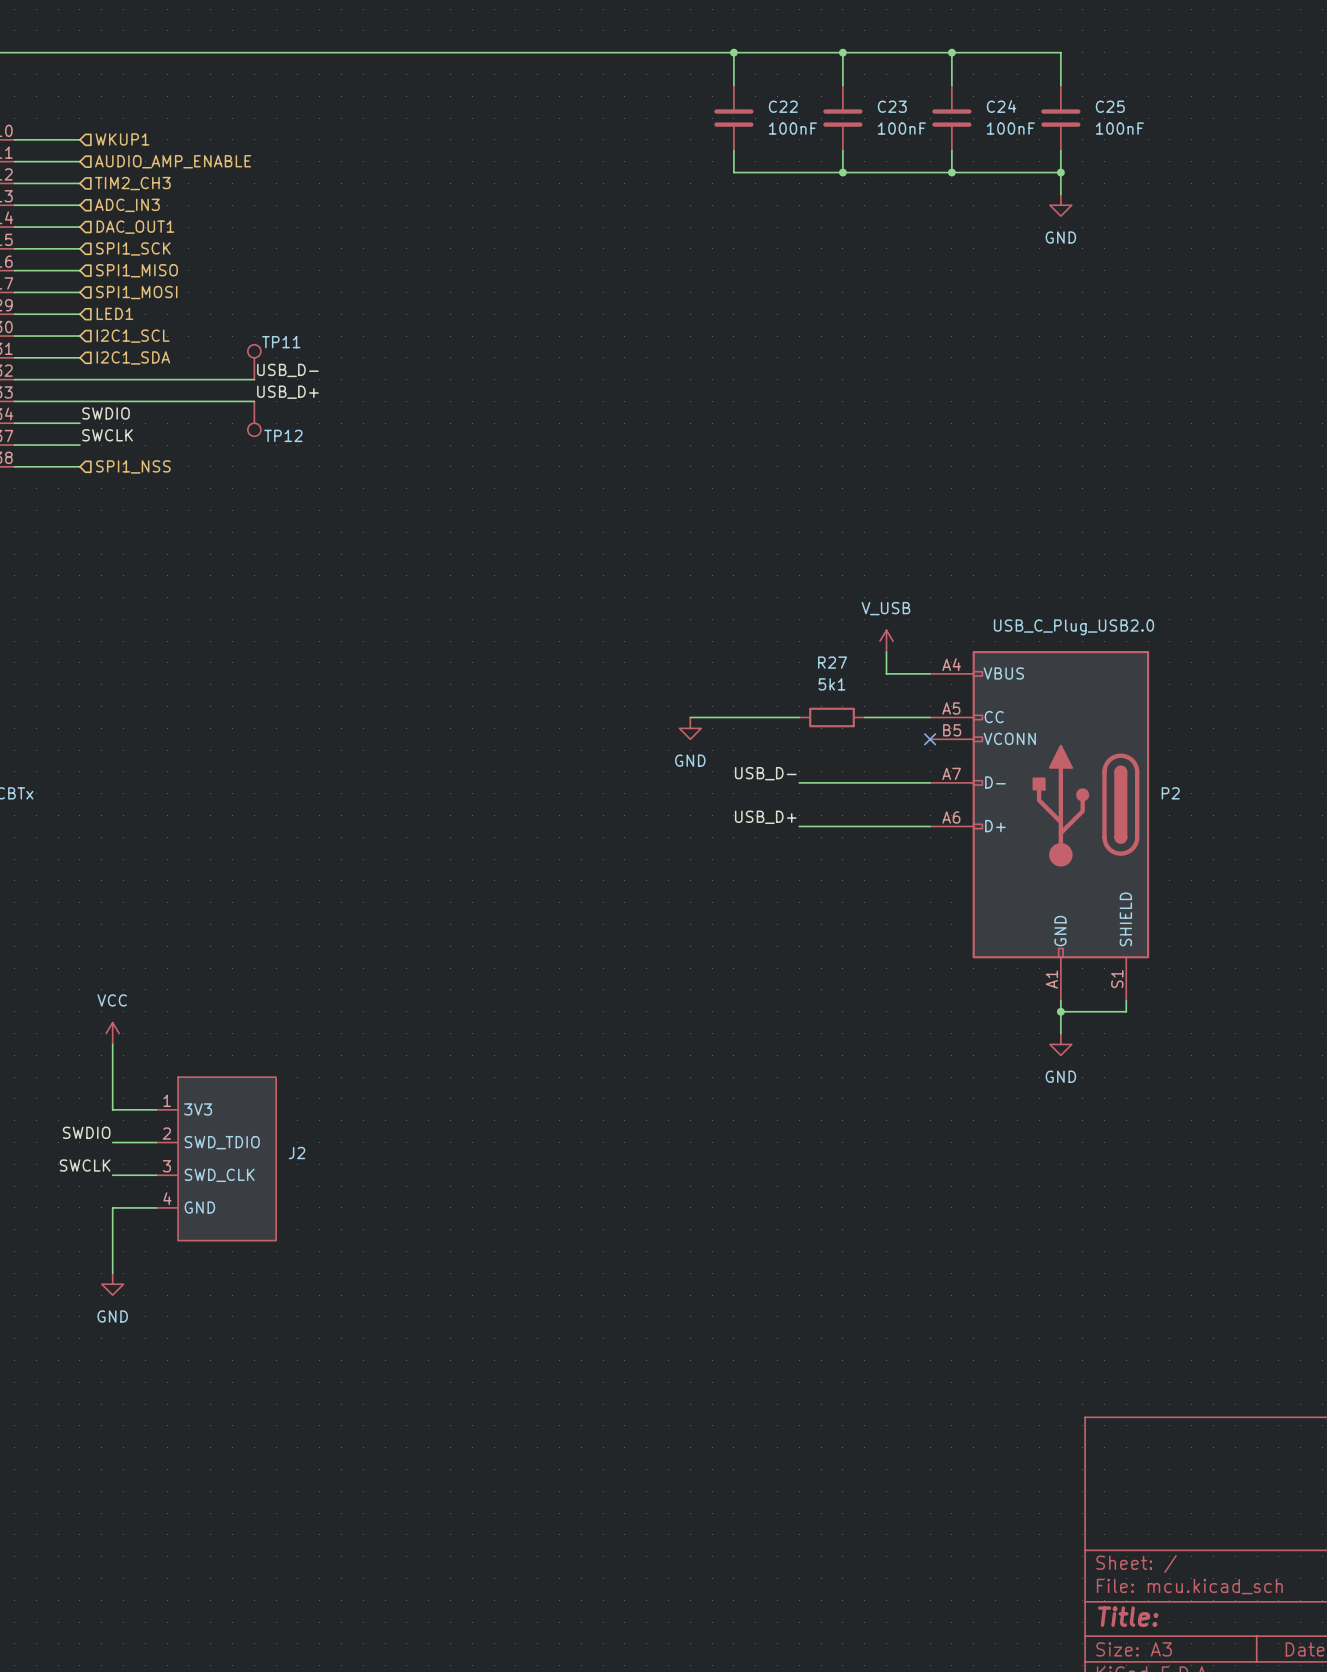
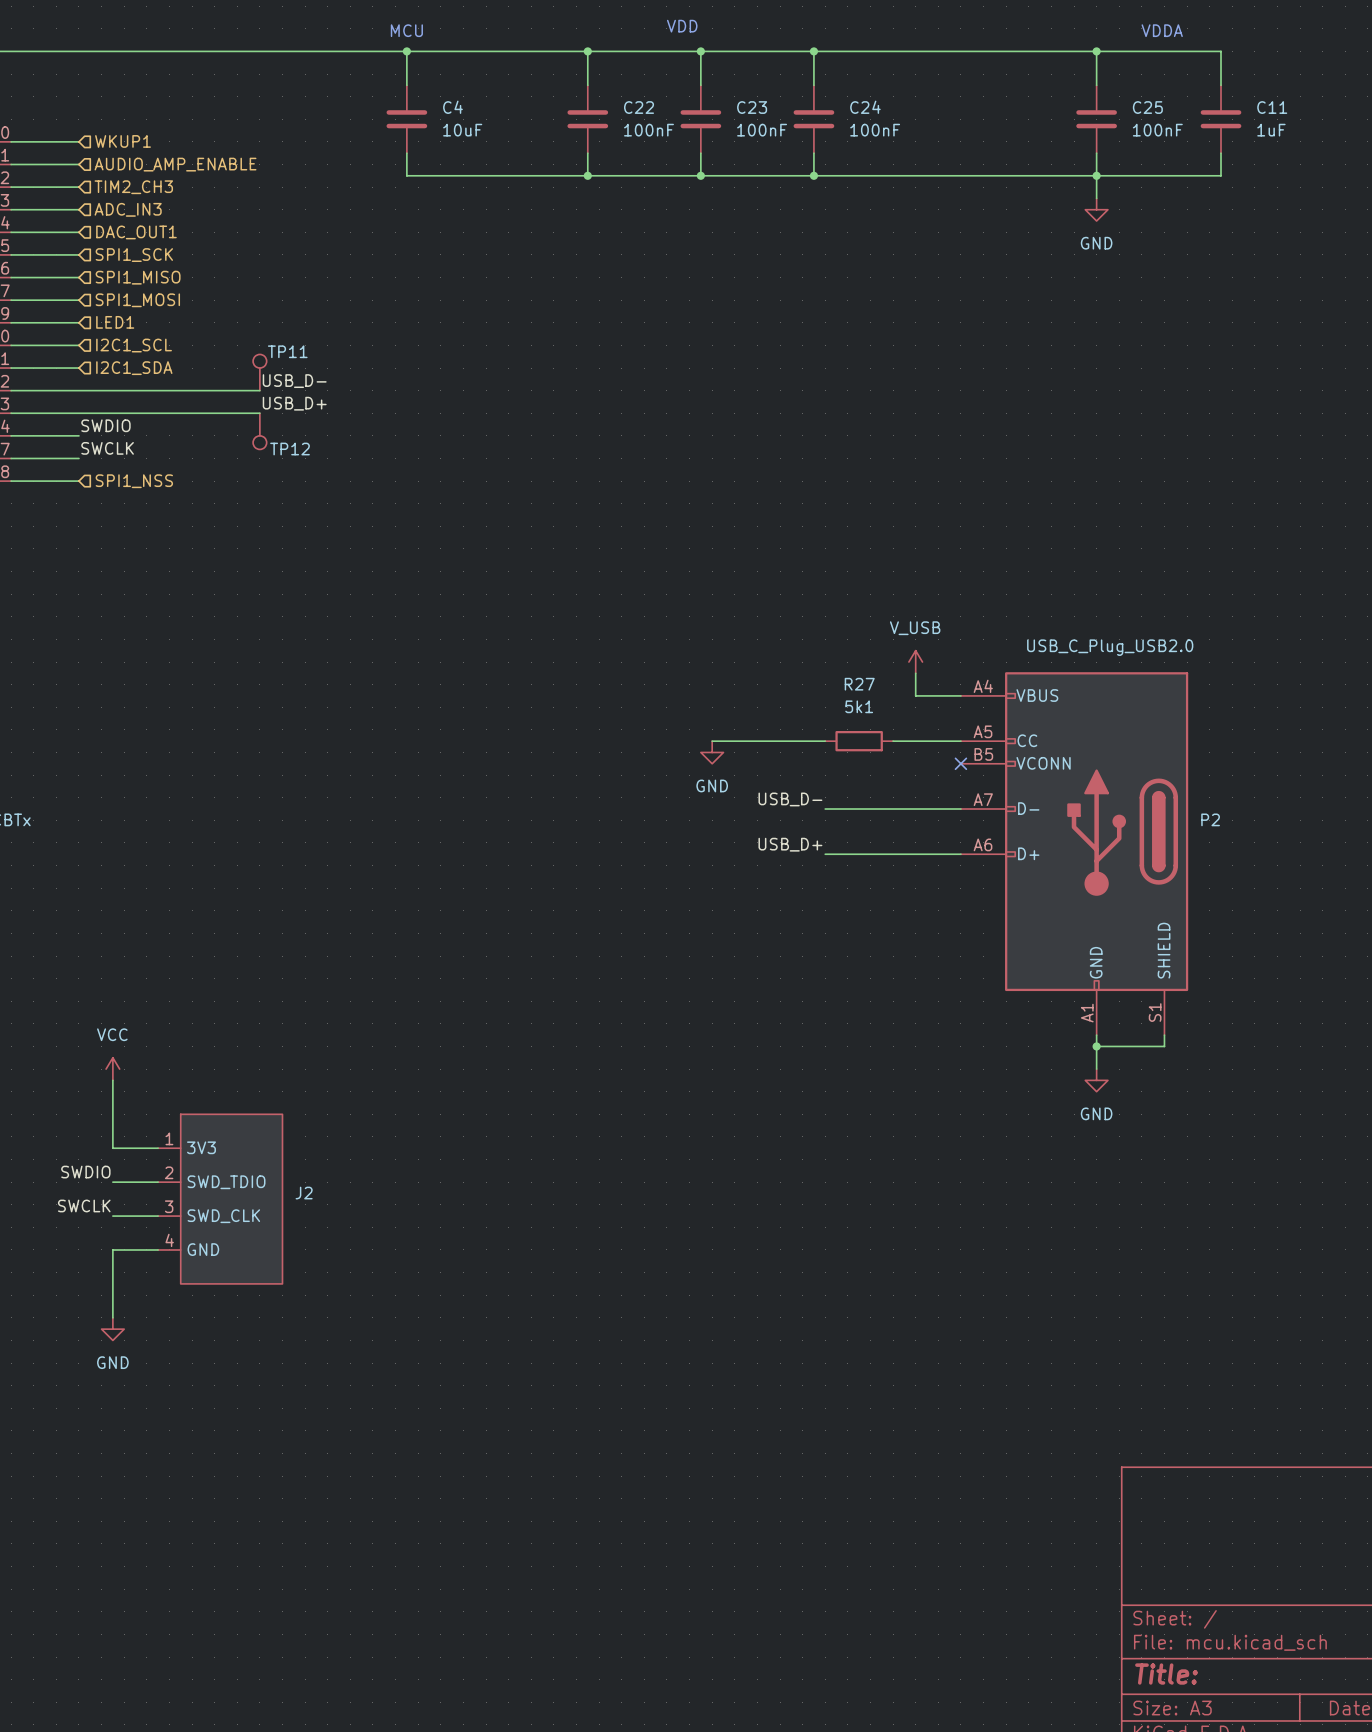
text: none -> VDD (682, 26)
text: none -> MCU (406, 30)
text: none -> VDDA (1162, 30)
wire: none -> (406, 51) (406, 85)
junction: none -> (406, 51)
junction: none -> (587, 51)
junction: none -> (700, 51)
wire: (733, 52) (733, 85) -> (587, 51) (587, 85)
junction: (733, 52) -> none
junction: none -> (813, 51)
wire: (842, 52) (842, 85) -> (700, 51) (700, 85)
junction: (842, 52) -> none
wire: (951, 52) (951, 85) -> (813, 51) (813, 85)
junction: (951, 52) -> none
wire: none -> (1096, 51) (1221, 51) (1221, 85)
junction: none -> (1096, 51)
C4: none -> 10uF (406, 119)
C22 position: (733, 118) -> (587, 119)
C23 position: (842, 118) -> (700, 119)
C24 position: (951, 118) -> (813, 119)
C11: none -> 1uF (1221, 119)
wire: none -> (587, 153) (587, 175)
wire: (733, 150) (733, 172) -> (406, 153) (406, 175) (757, 175)
wire: (842, 150) (842, 172) -> (700, 153) (700, 175)
wire: (951, 150) (951, 172) -> (813, 153) (813, 175)
wire: none -> (1221, 153) (1221, 175) (1096, 175)
junction: none -> (587, 175)
junction: none -> (700, 175)
junction: none -> (813, 175)
junction: (842, 172) -> none
junction: (951, 172) -> none

